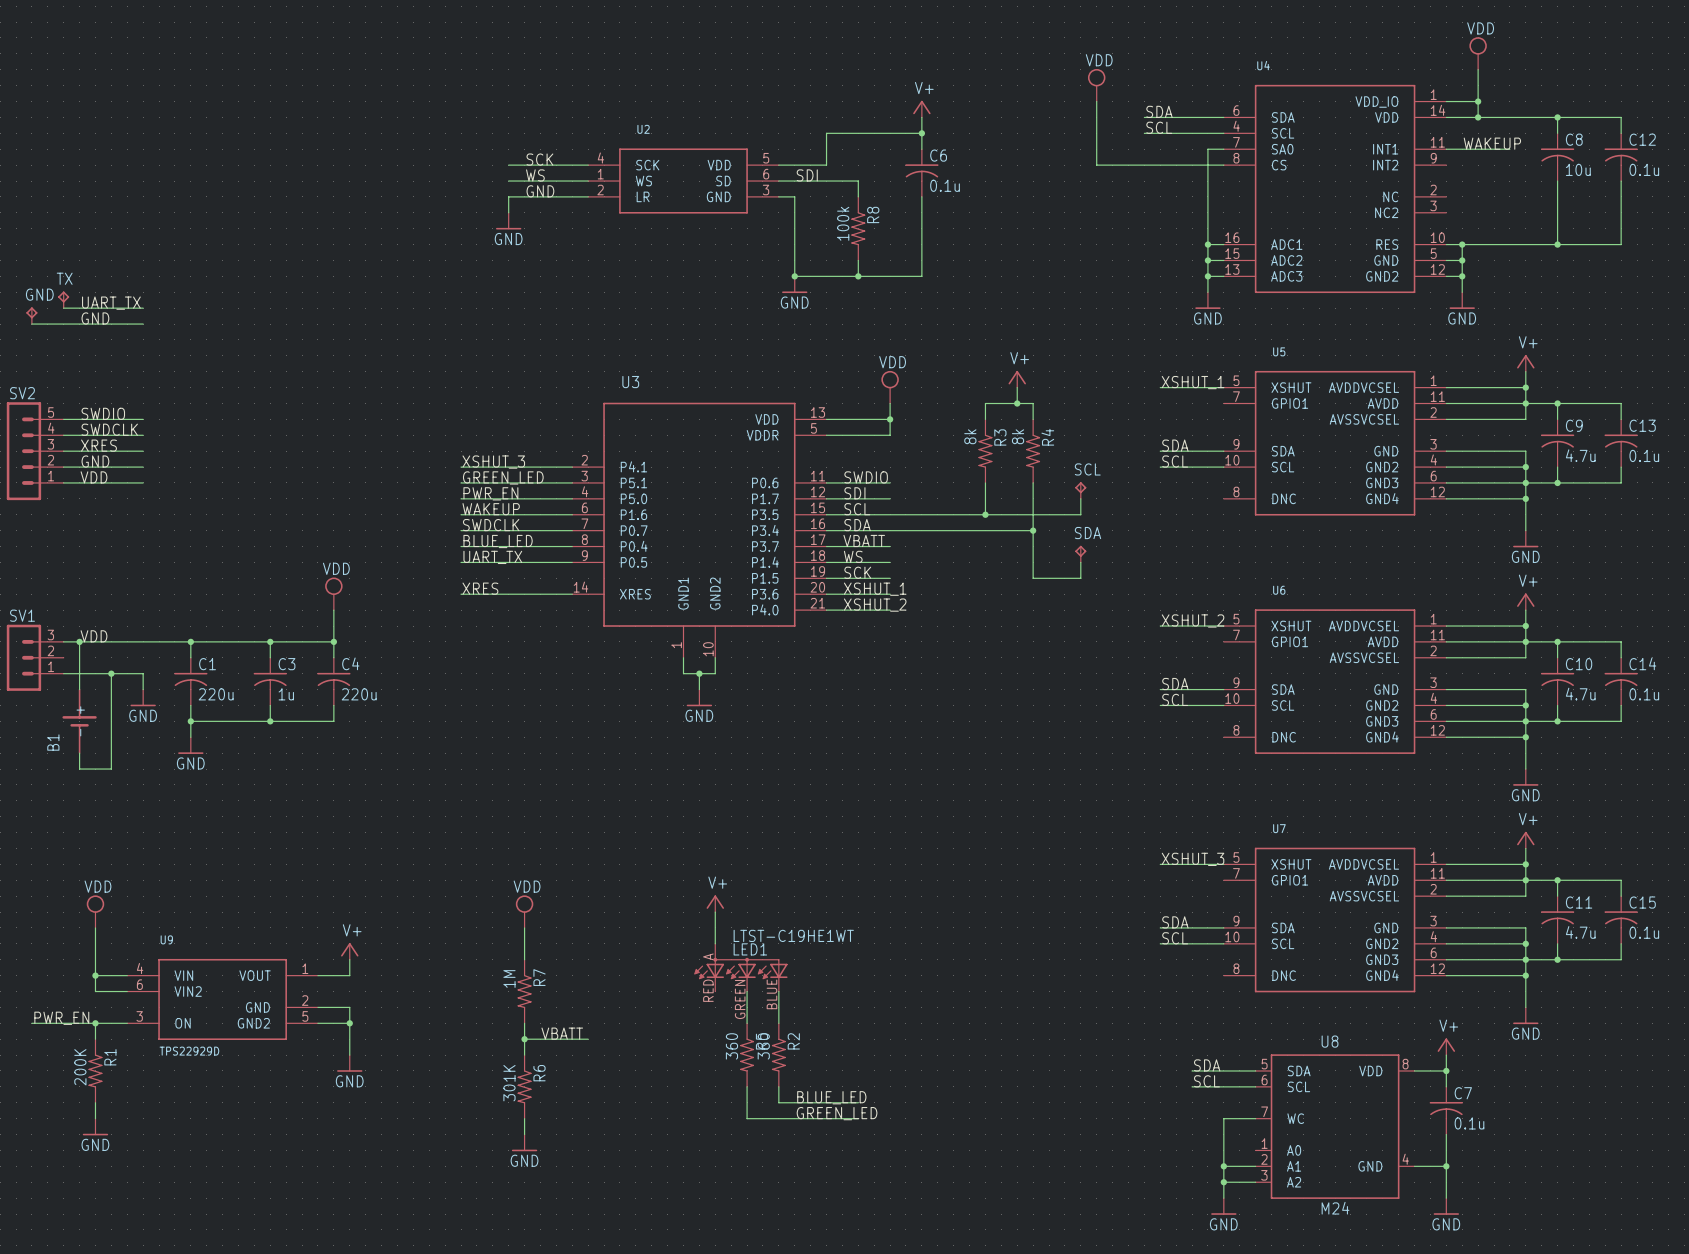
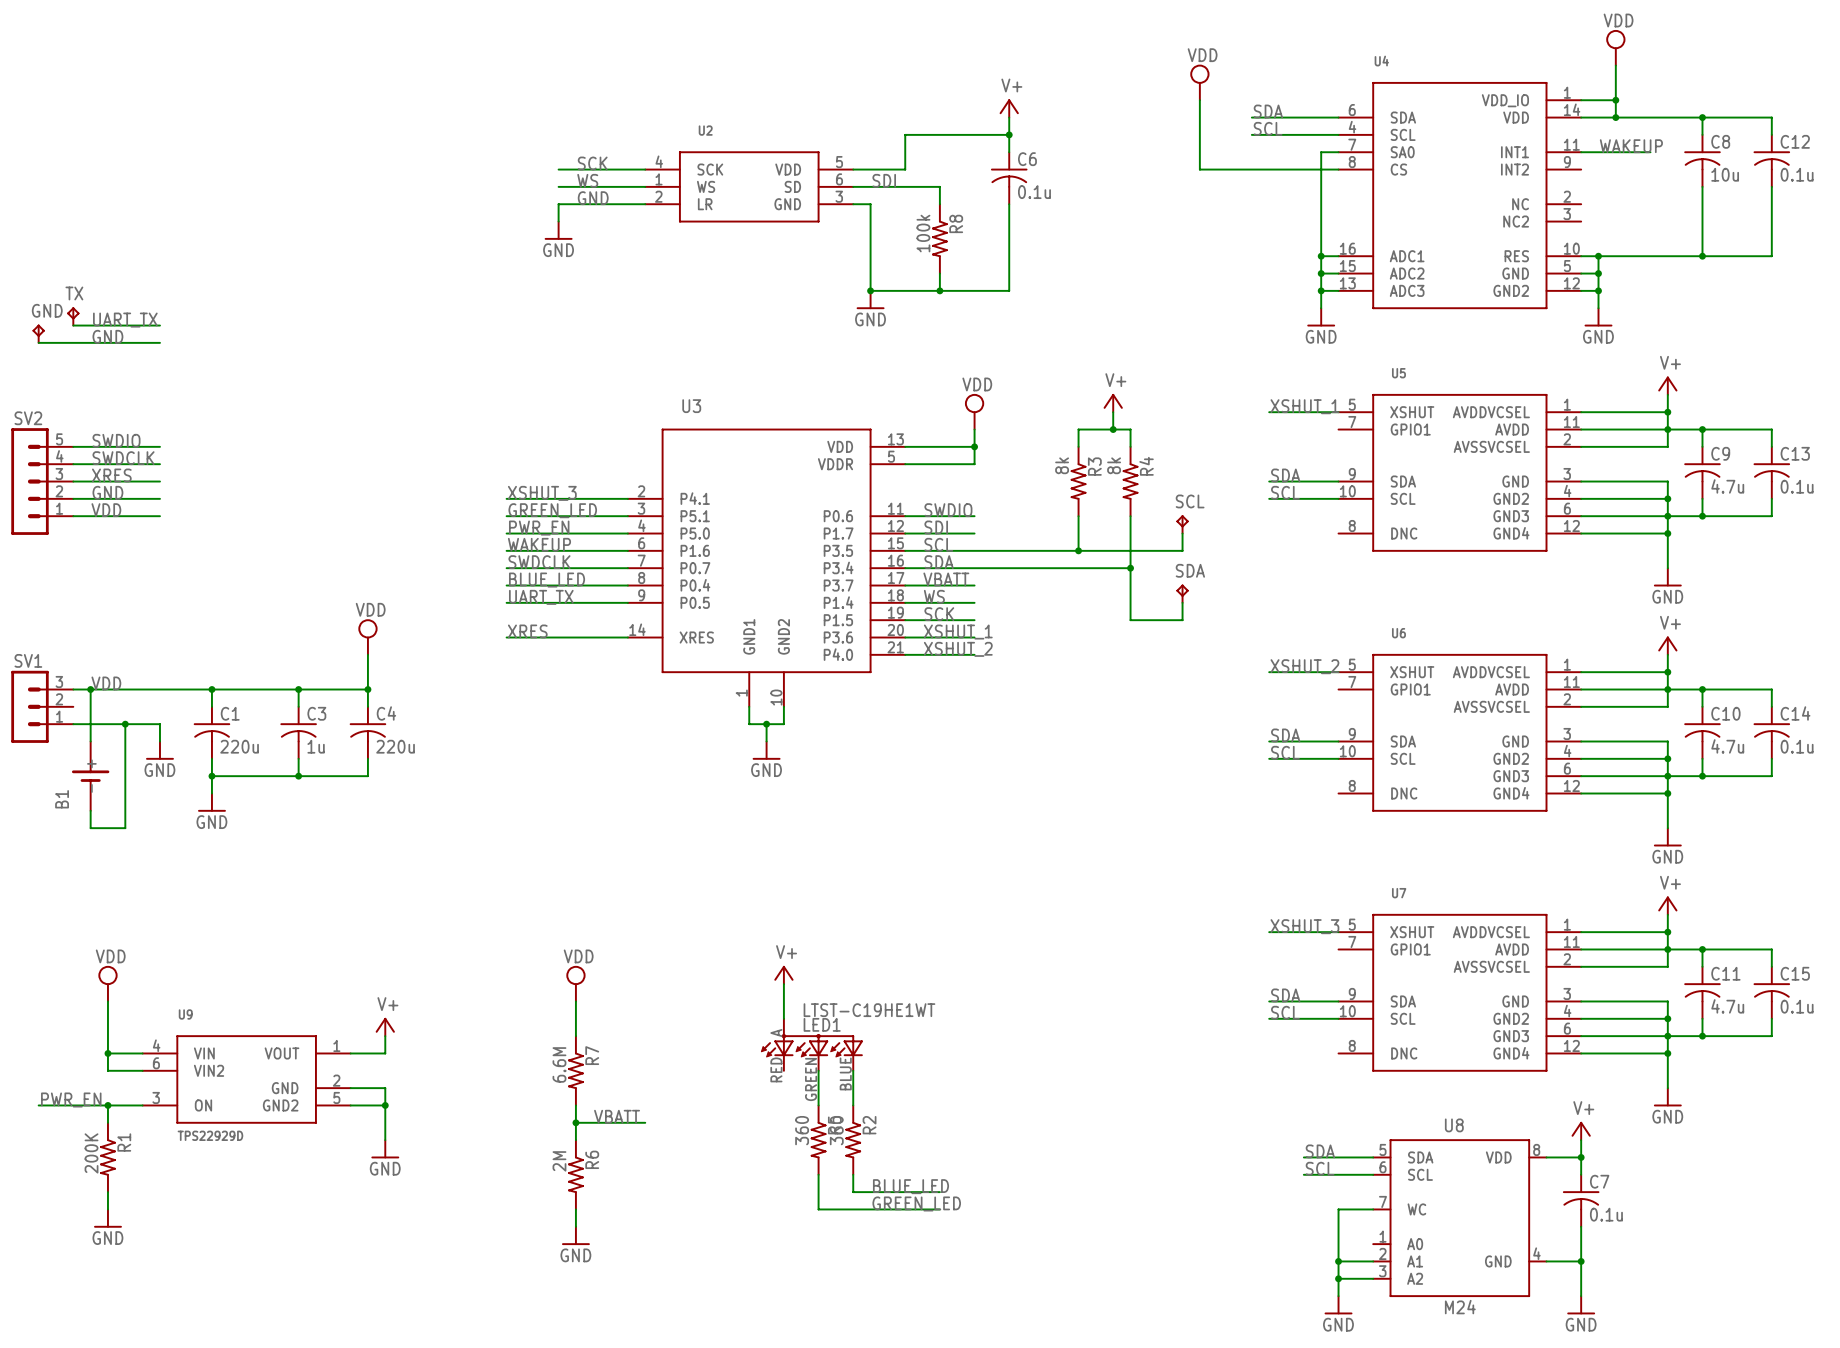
R7 value: 1M (509, 979) -> 6.6M (559, 1064)
R6 value: 301K (509, 1083) -> 2M (559, 1161)

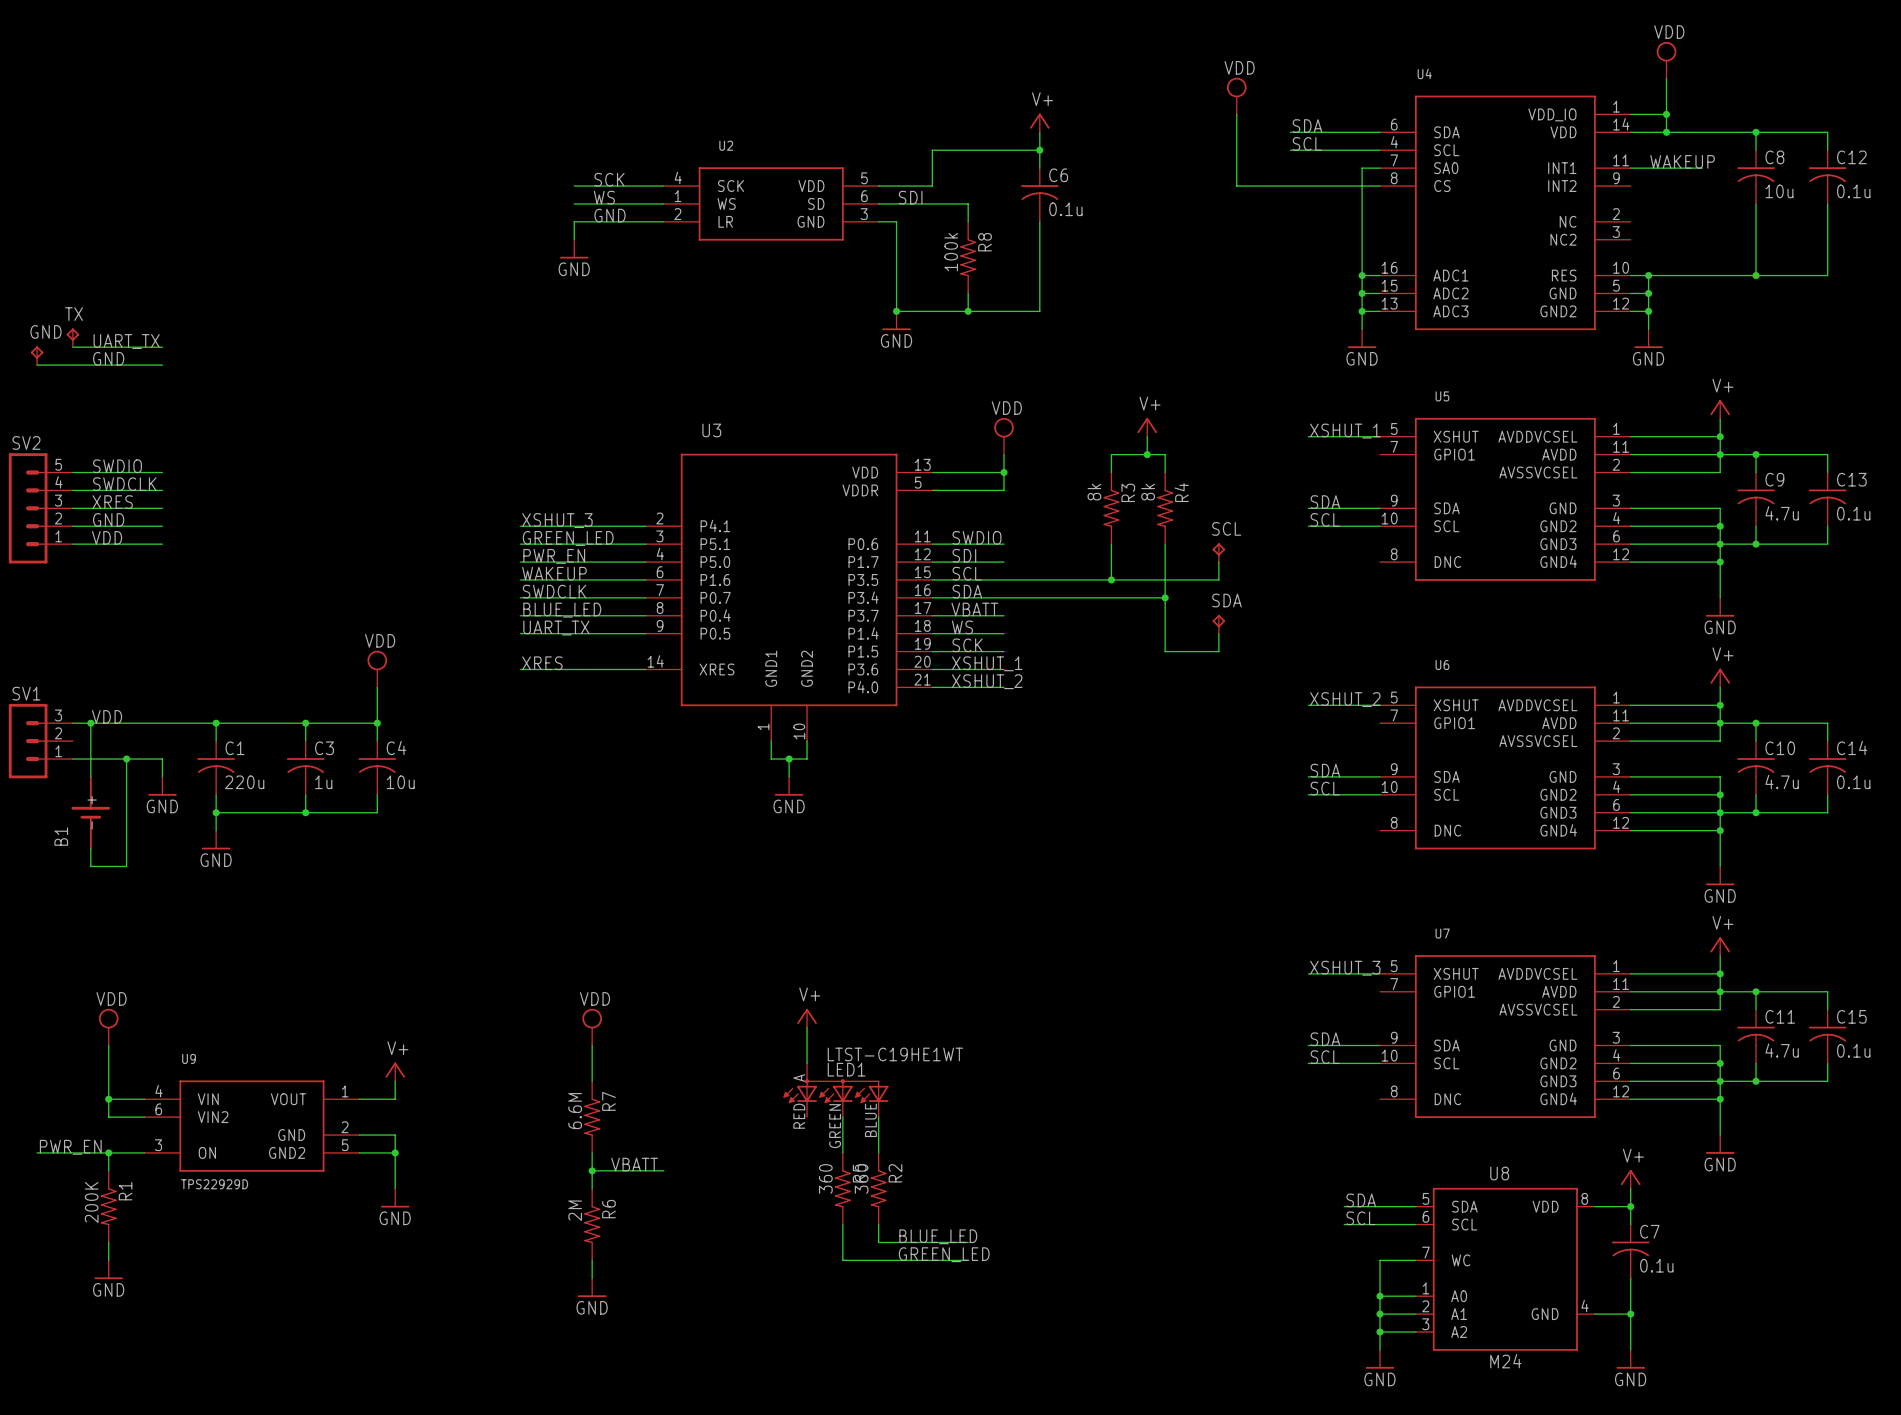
C4 value: 220u (395, 746) -> 10u (400, 782)
wire: none -> (1380, 1296) (1415, 1296)
junction: none -> (1380, 1296)

